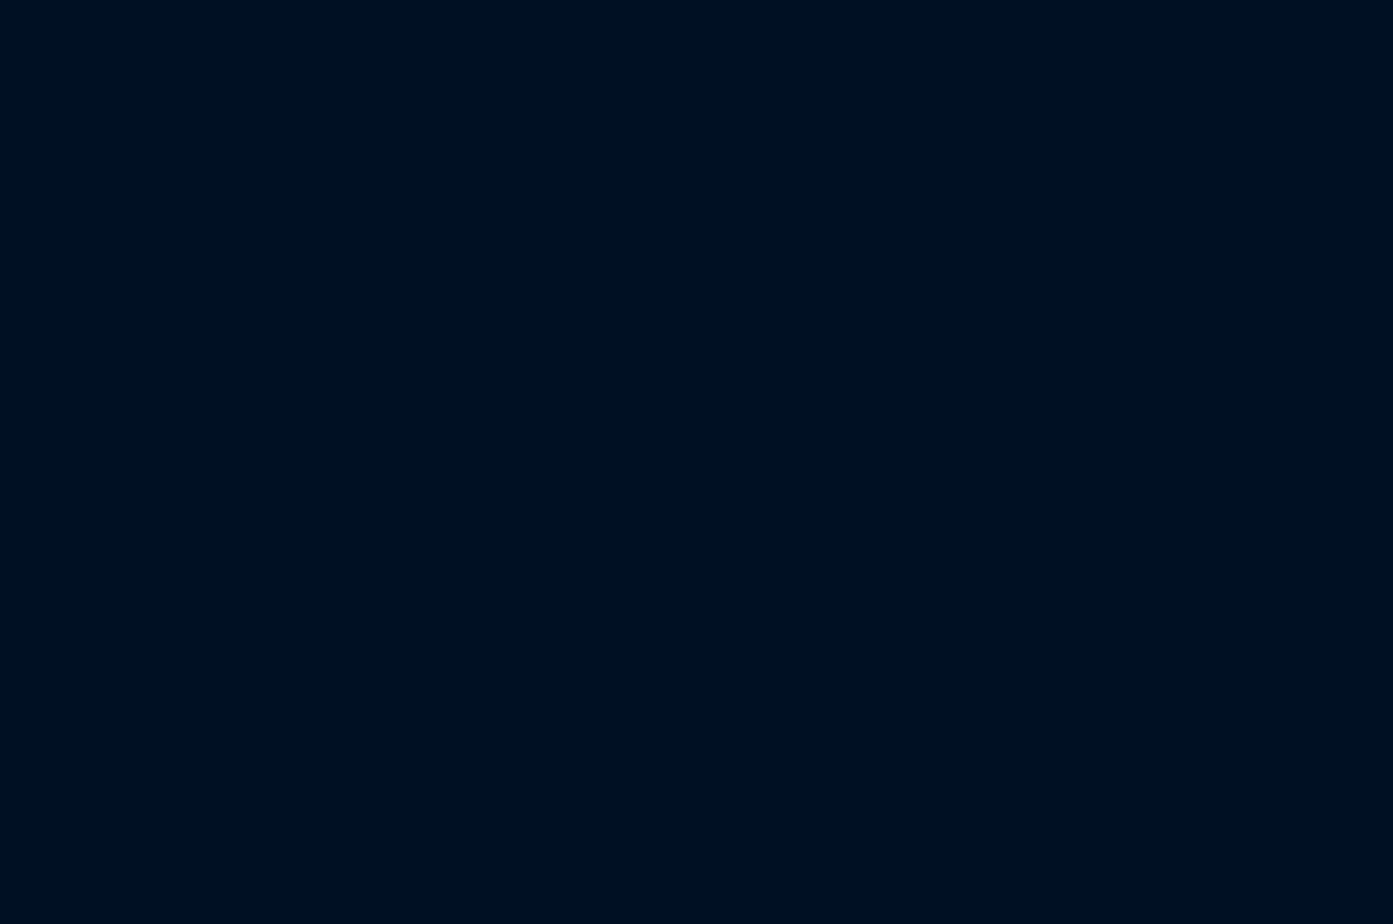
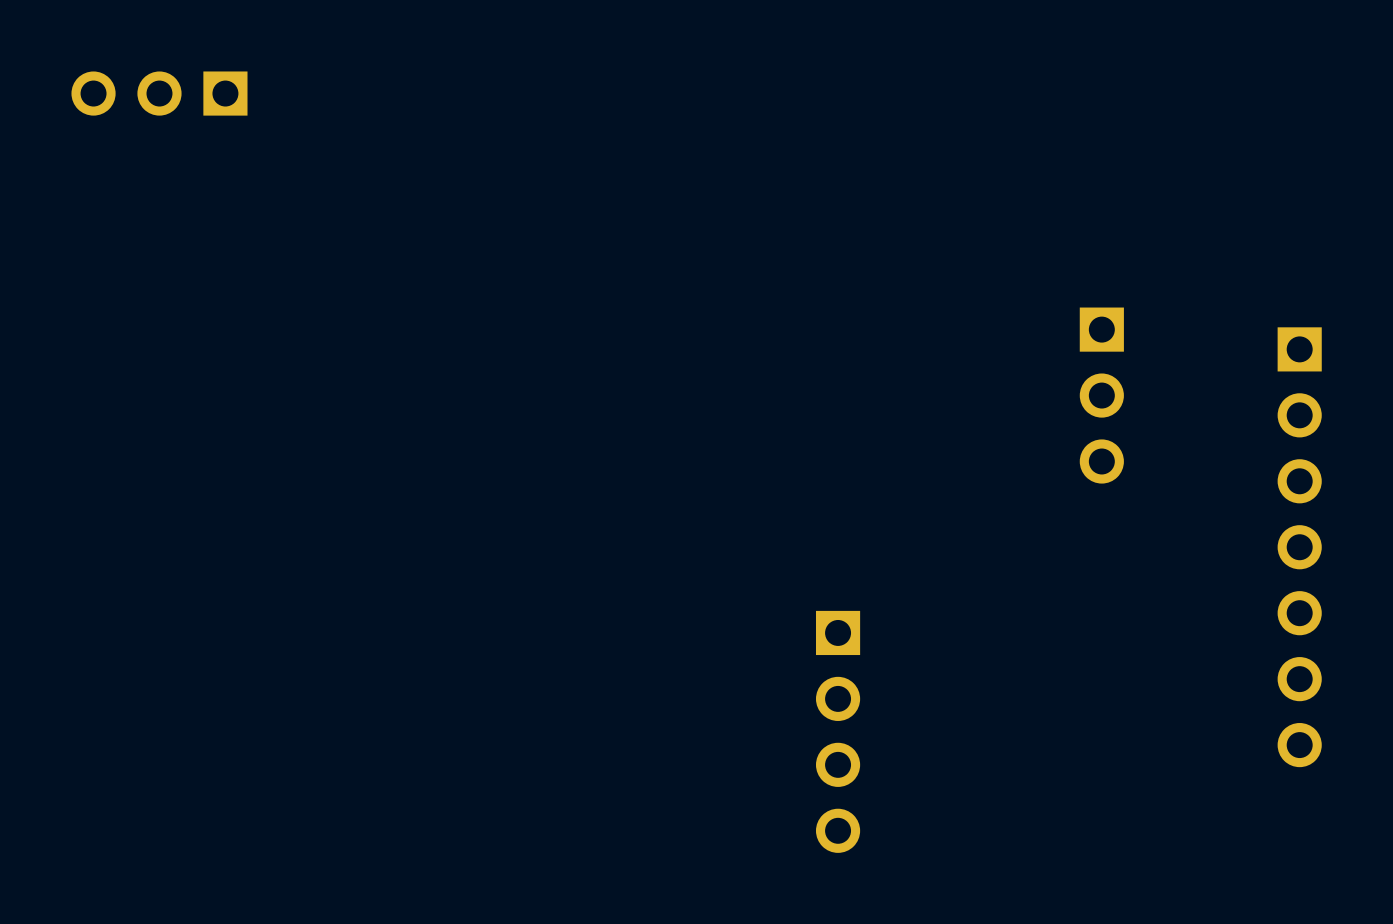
part: none -> (159, 93)
part: none -> (1101, 395)
part: none -> (1299, 547)
part: none -> (838, 731)

